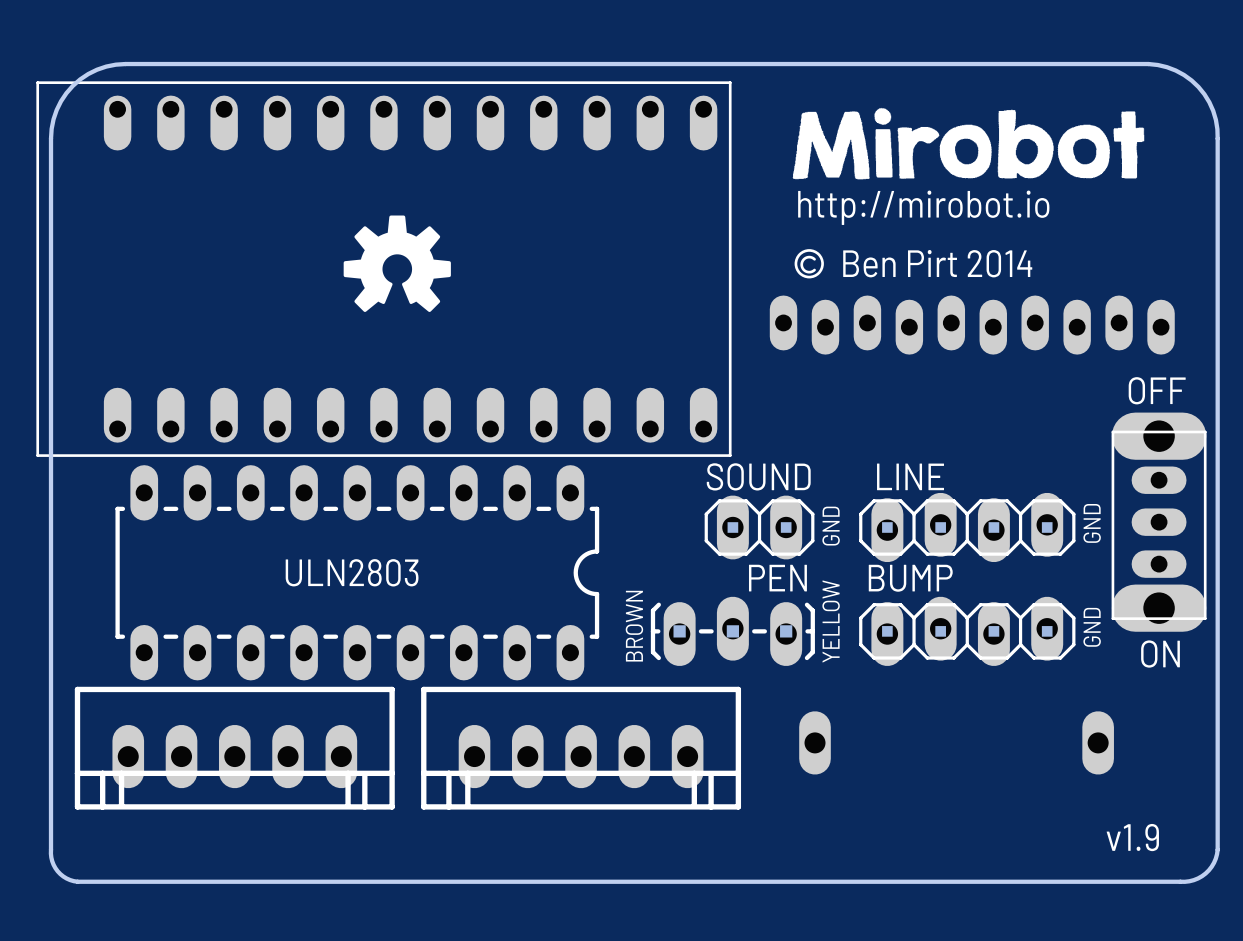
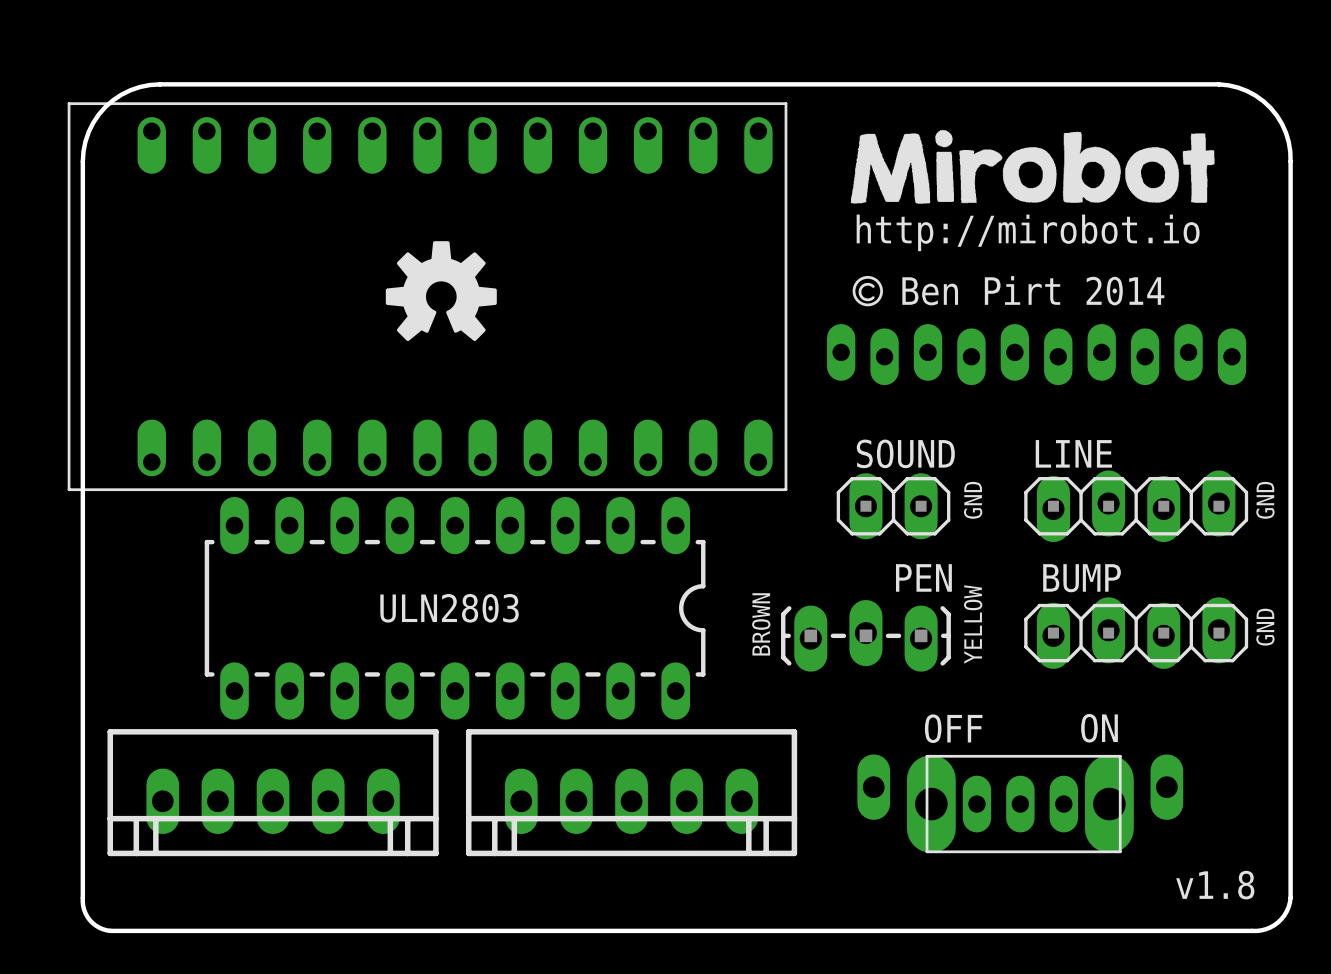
text position: OFF (1157, 390) -> OFF (953, 728)
text: none -> GND (973, 500)
text: none -> GND (1265, 500)
SOUND name position: SOUND (758, 476) -> SOUND (905, 453)
part rotation: 0° (1159, 522) -> 90° counterclockwise (1020, 804)
part position: (1159, 522) -> (1020, 804)
text: GND (1092, 523) -> none
text: GND (831, 526) -> none
SOUND position: (759, 527) -> (893, 506)
LINE position: (967, 527) -> (1136, 506)
ULN2803 position: (357, 572) -> (455, 608)
PEN name position: PEN (777, 578) -> PEN (923, 577)
text: none -> GND (1265, 627)
text position: YELLOW (831, 621) -> YELLOW (973, 624)
text position: BROWN (634, 626) -> BROWN (761, 624)
text: GND (1092, 627) -> none
PEN position: (732, 631) -> (865, 635)
BUMP position: (967, 631) -> (1136, 633)
text position: ON (1160, 654) -> ON (1099, 728)
text: v1.9 (1132, 837) -> v1.8 (1215, 885)

